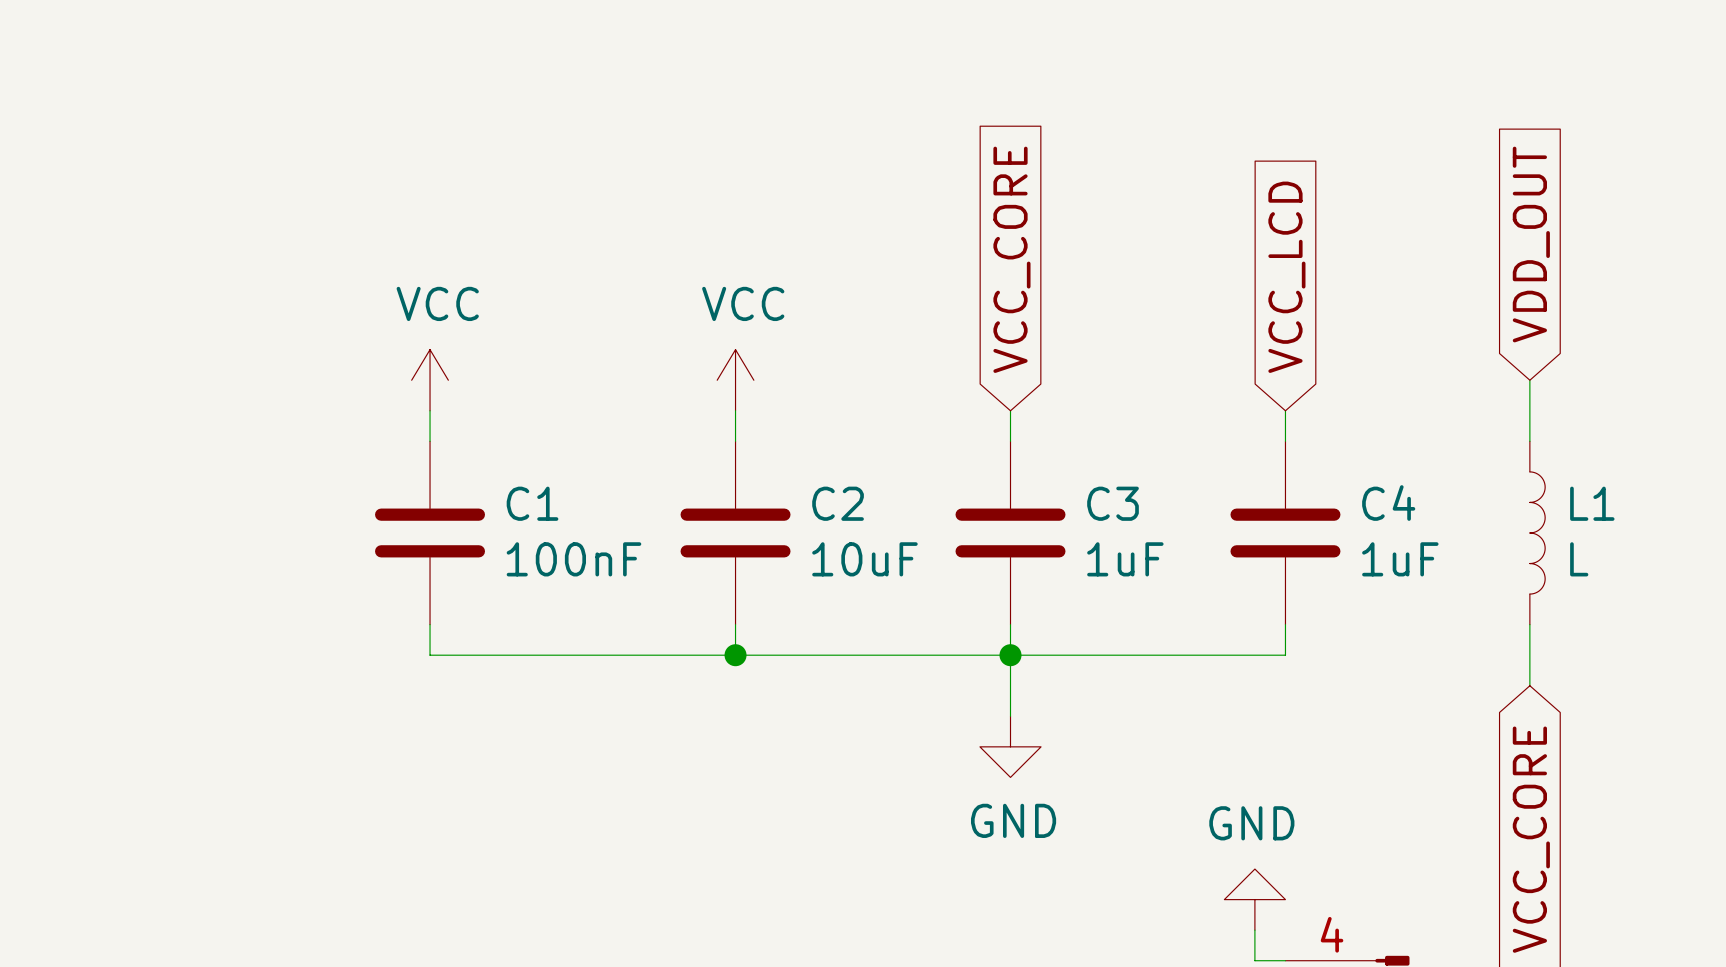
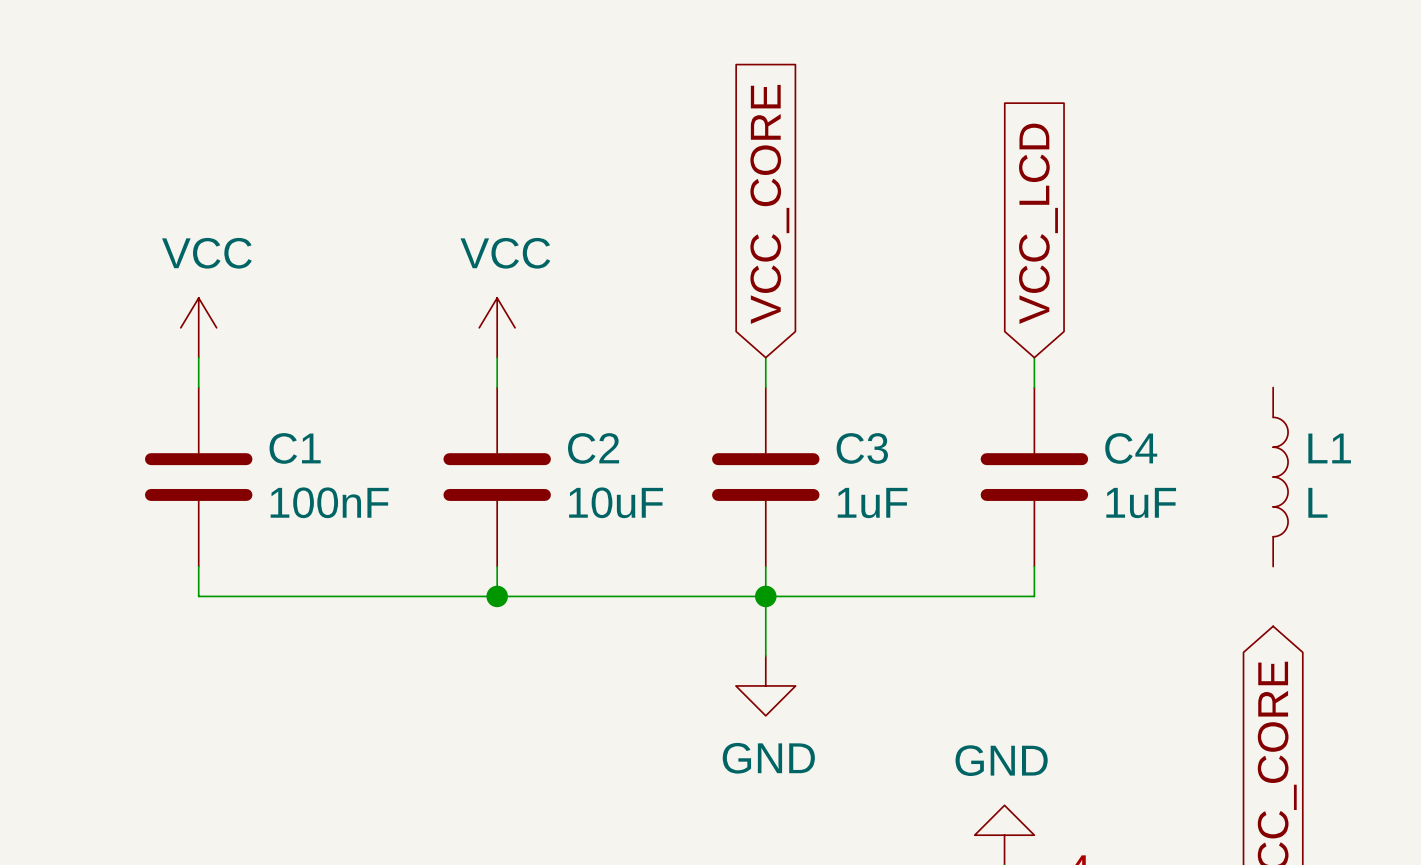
global label: VDD_OUT (1531, 244) -> none
wire: (1529, 380) (1529, 441) -> none
wire: (1529, 624) (1529, 685) -> none

